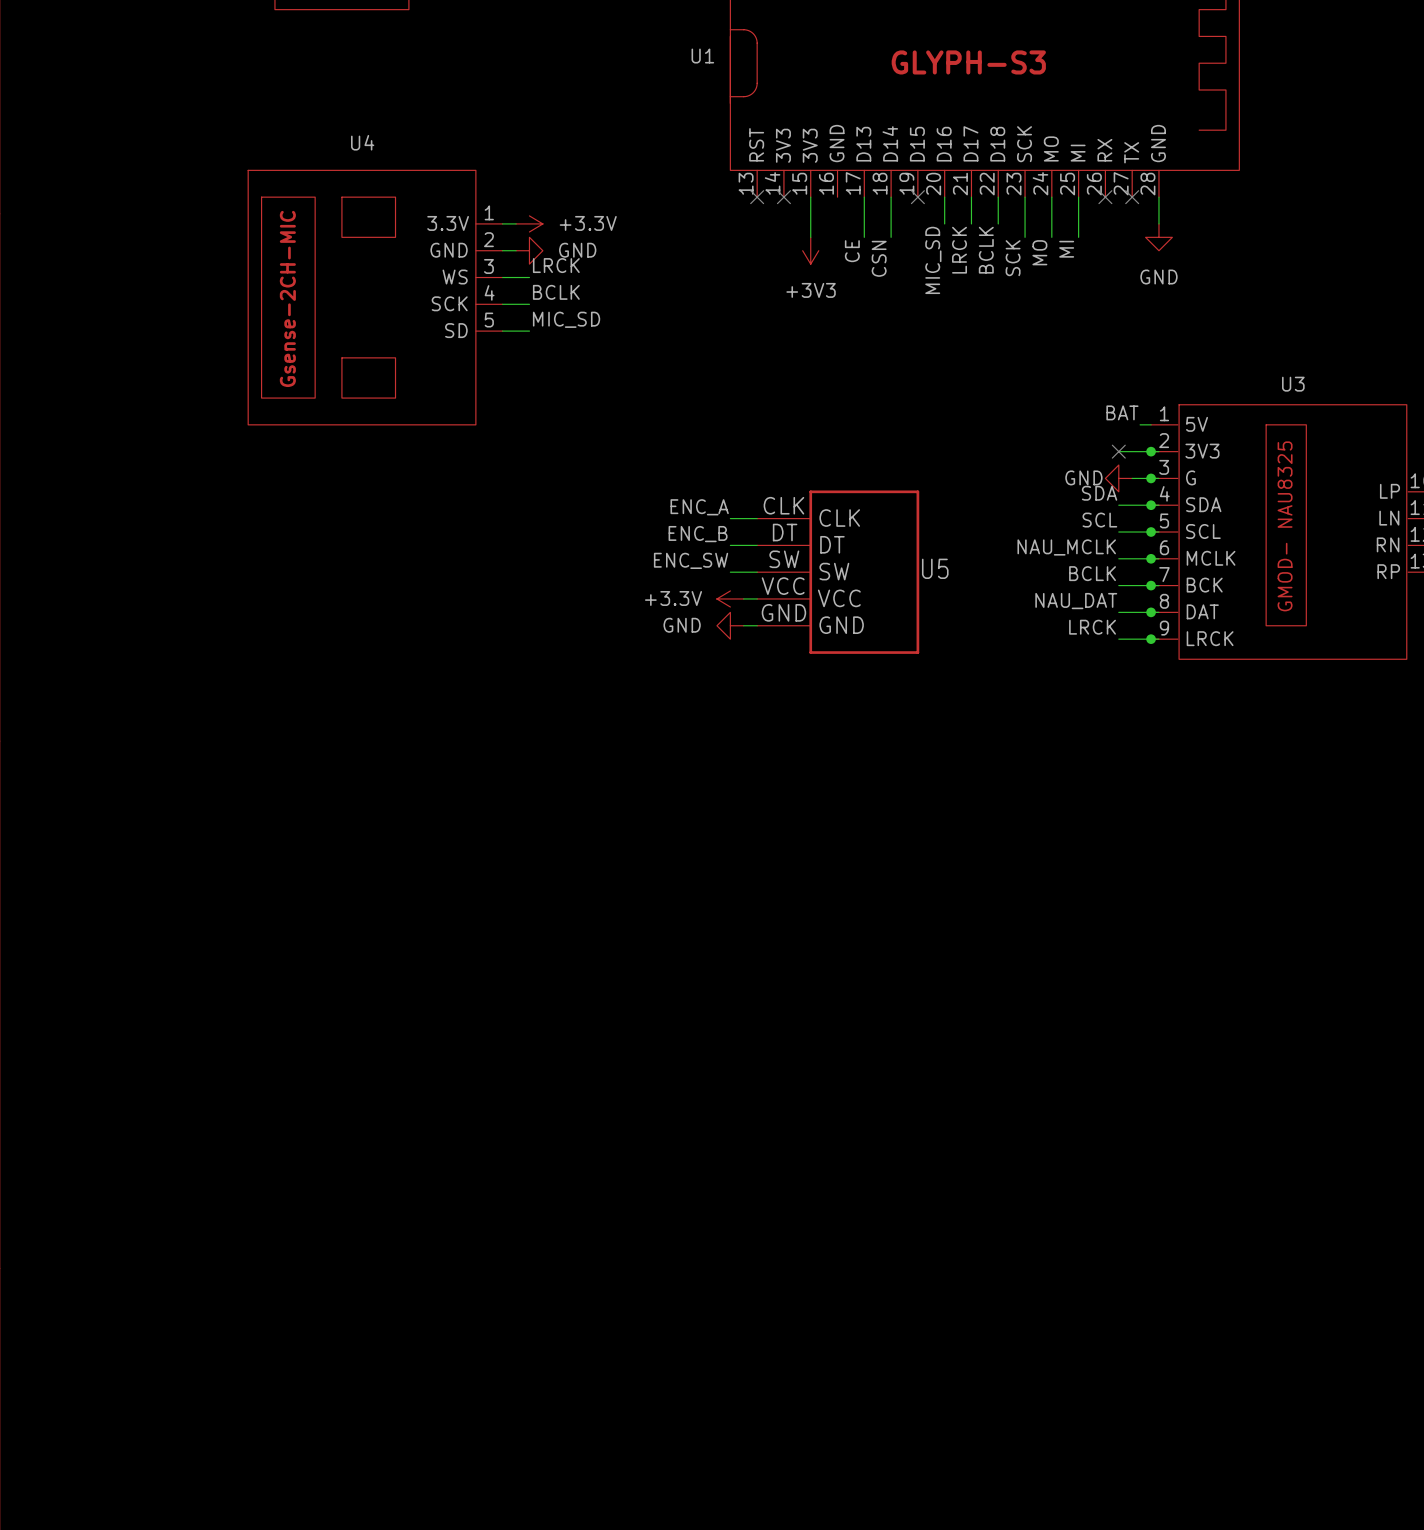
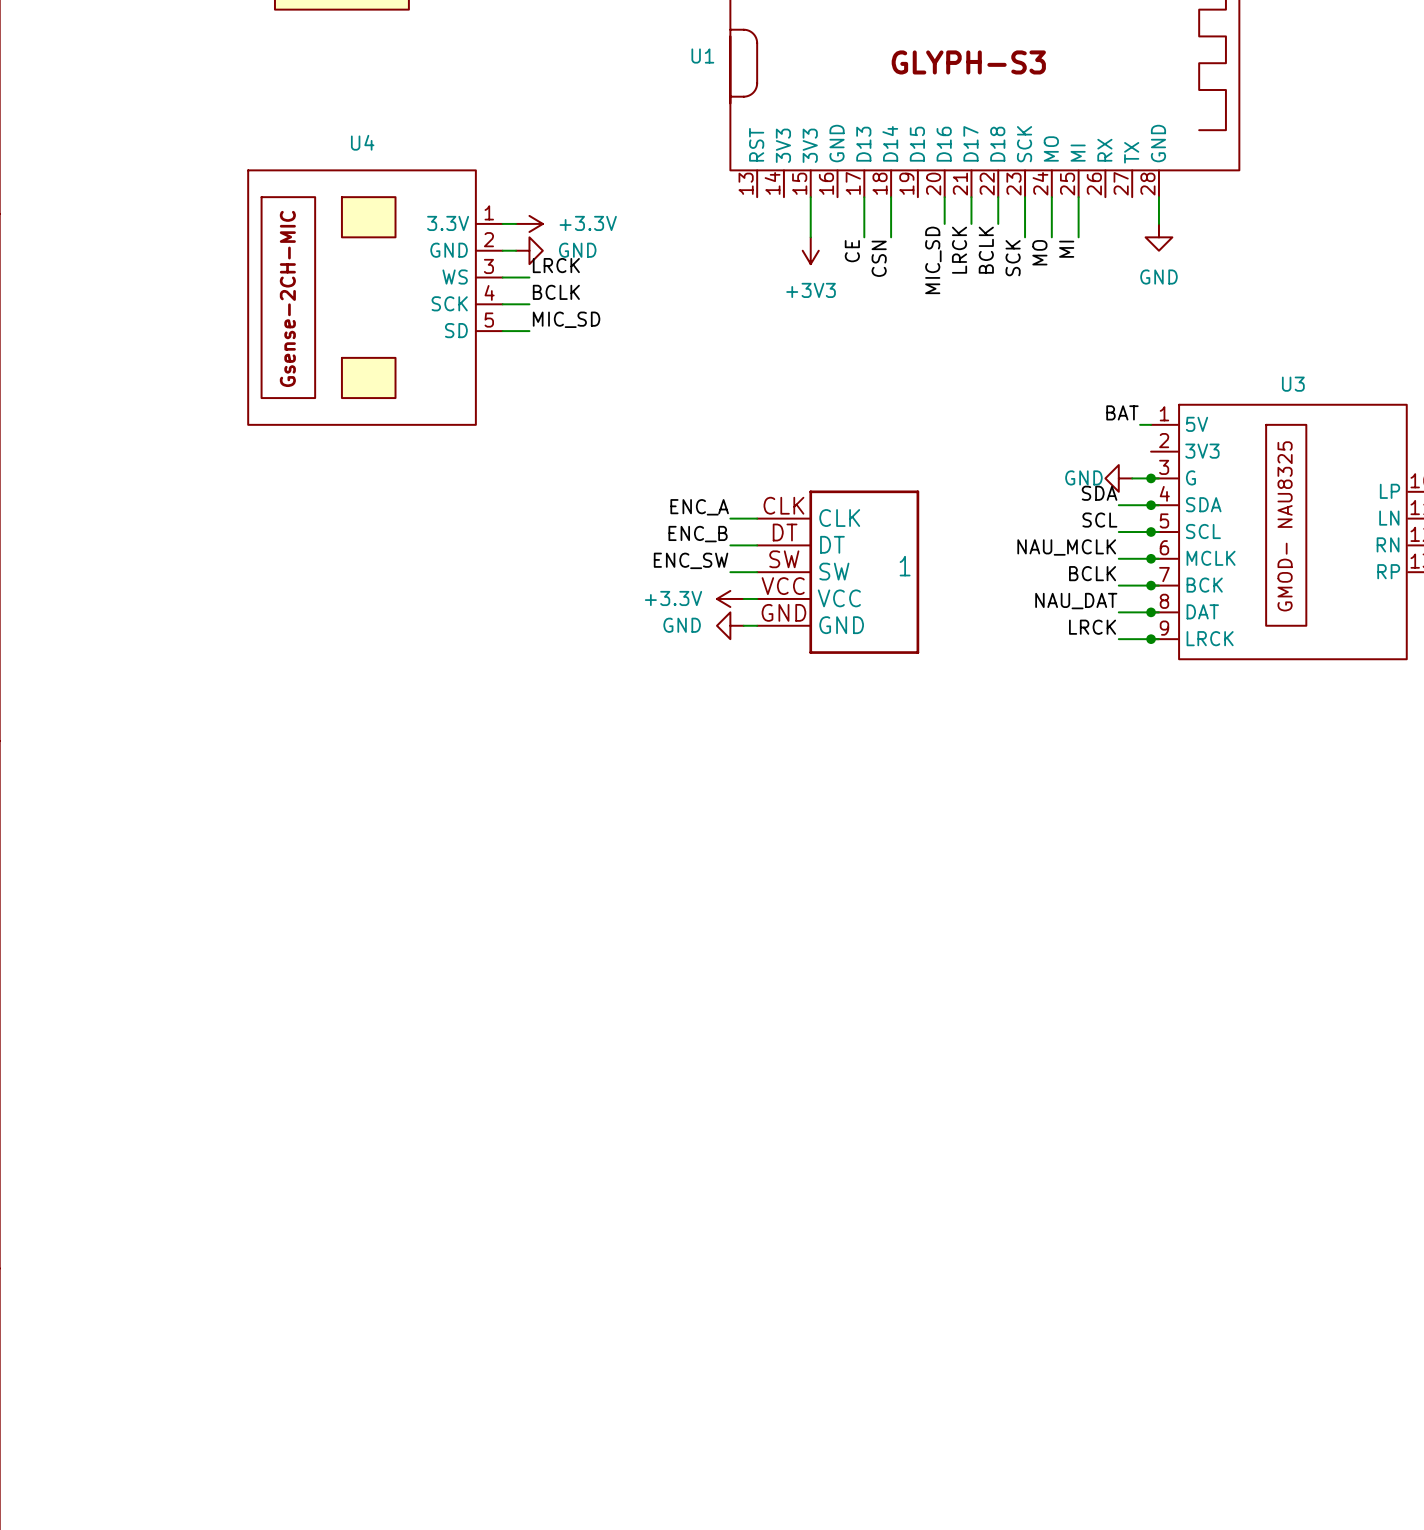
no-connect mark: (757, 197) -> none
no-connect mark: (783, 197) -> none
no-connect mark: (917, 197) -> none
no-connect mark: (1105, 197) -> none
no-connect mark: (1132, 197) -> none
wire: (1118, 451) (1158, 451) -> none
no-connect mark: (1118, 451) -> none
junction: (1151, 451) -> none
U5 name: U5 (935, 568) -> 1 (905, 566)

